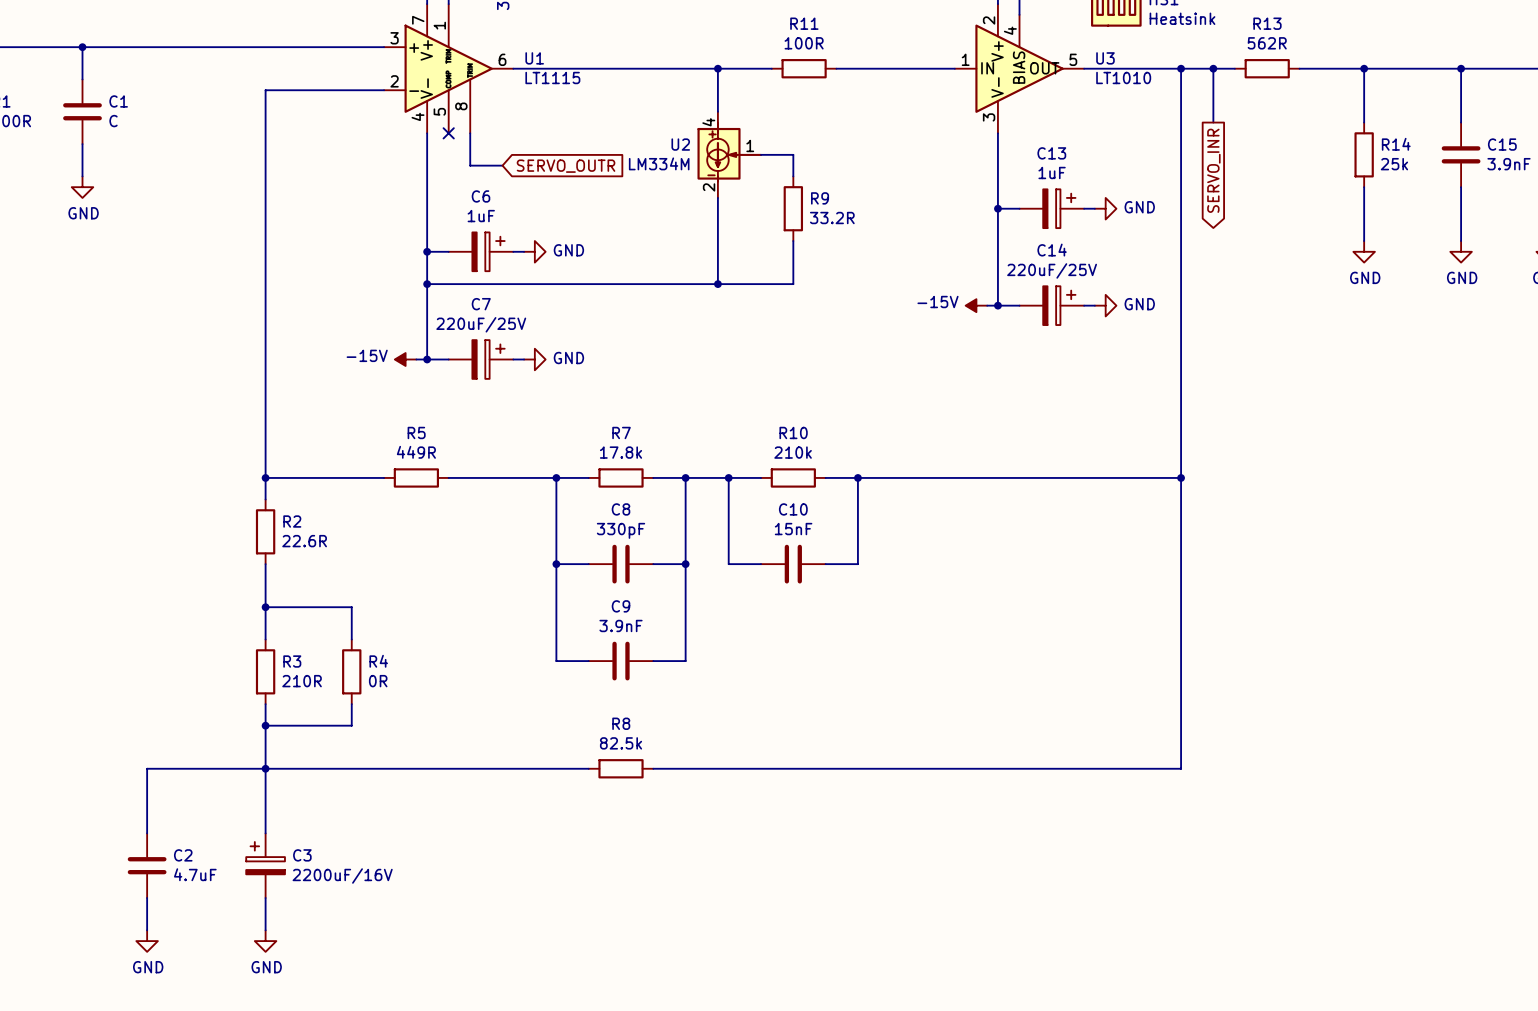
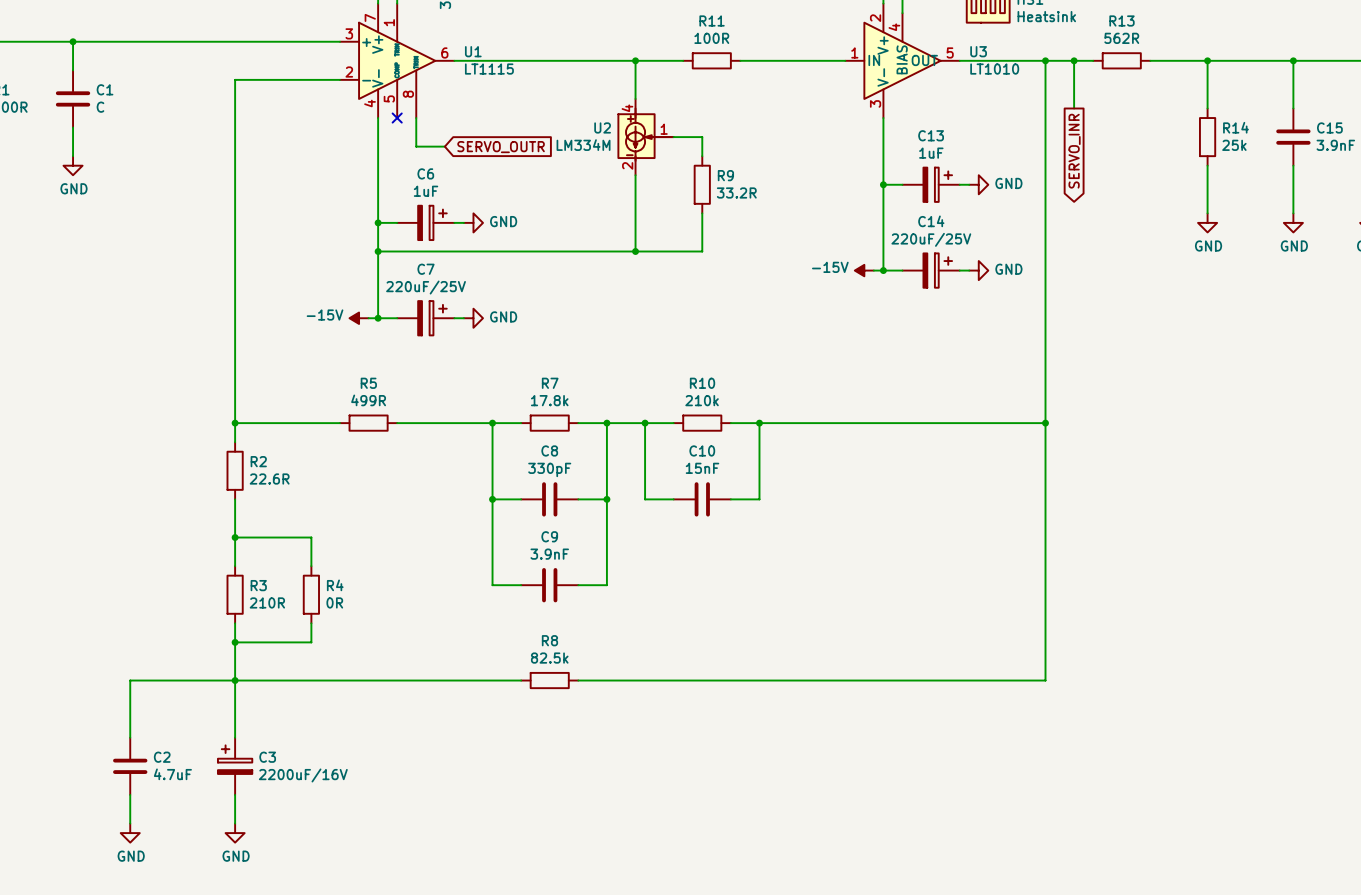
R5 value: 449R (416, 452) -> 499R (368, 400)

